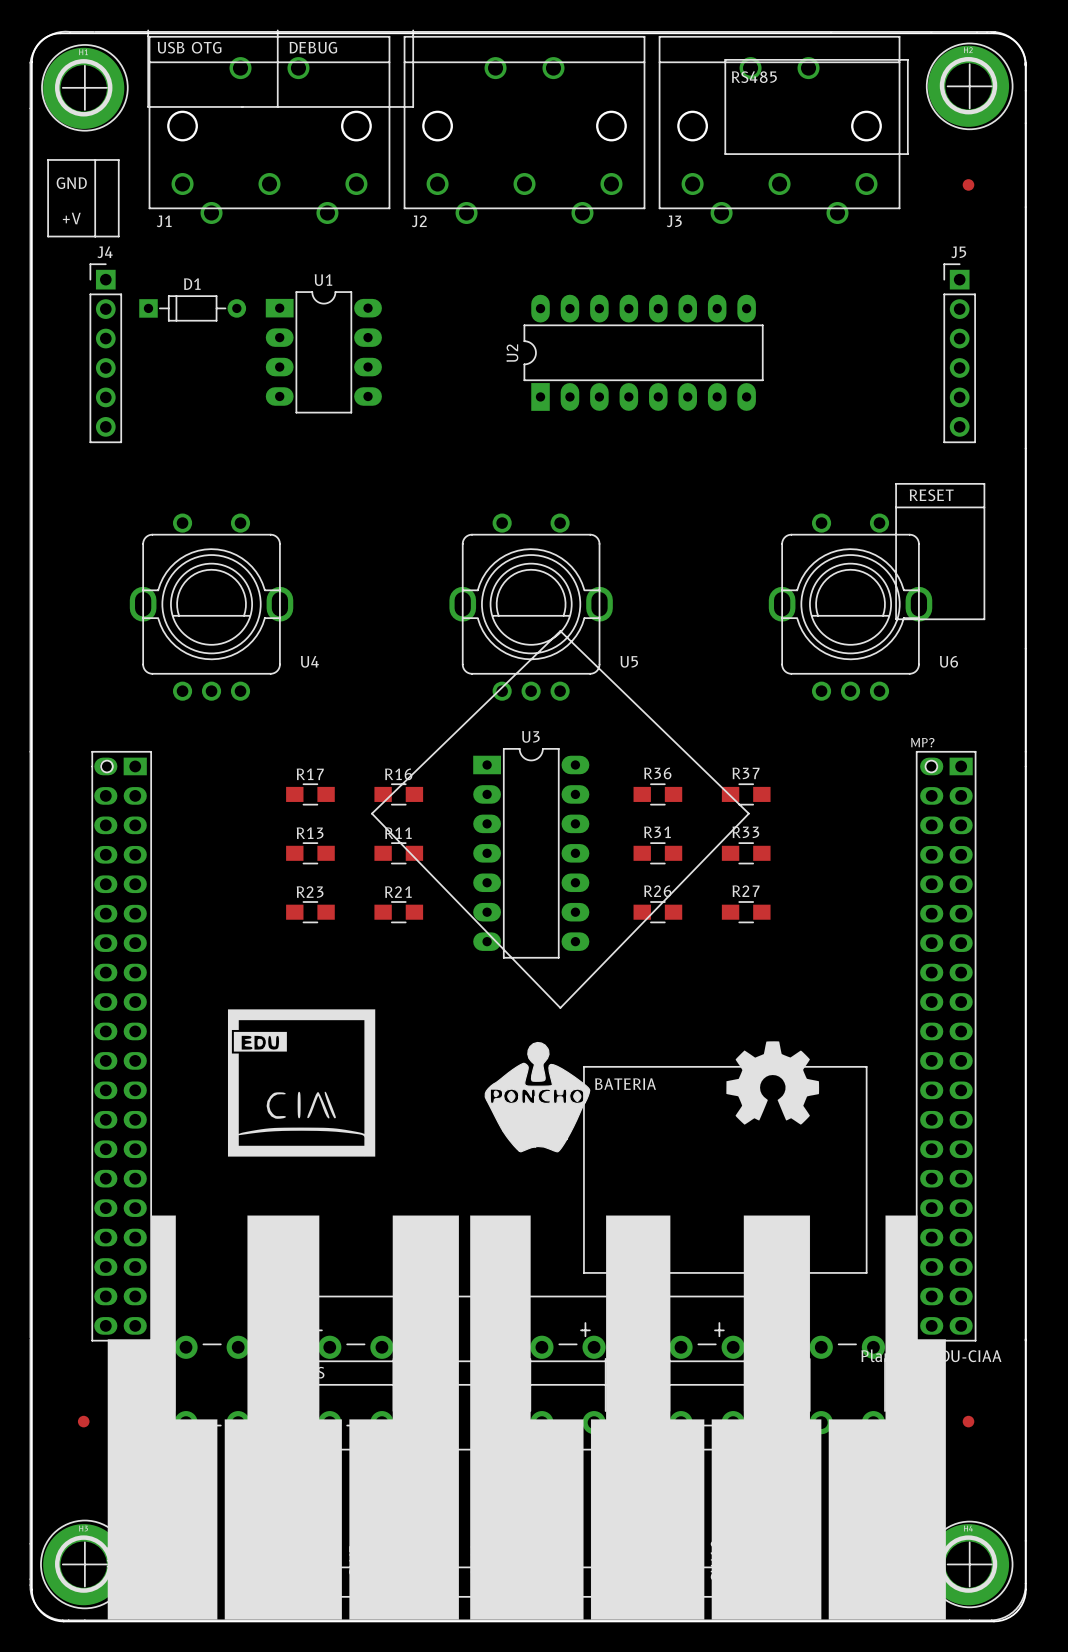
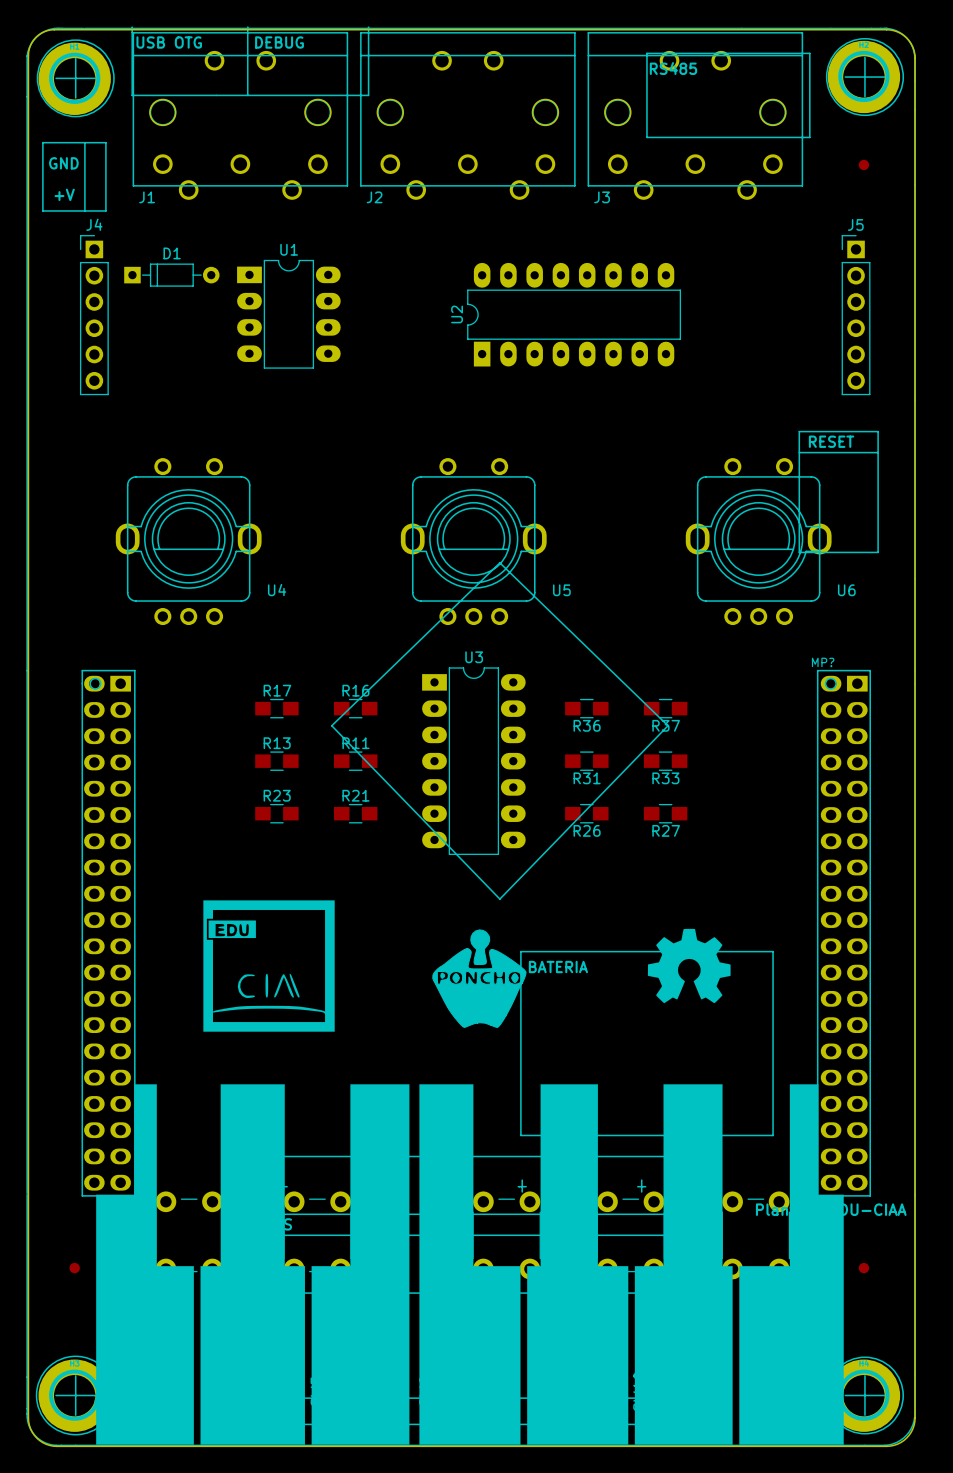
R36 name position: R36 (657, 773) -> R36 (587, 725)
R37 name position: R37 (746, 773) -> R37 (666, 725)
R31 name position: R31 (657, 832) -> R31 (587, 778)
R33 name position: R33 (745, 832) -> R33 (665, 778)
R26 name position: R26 (657, 891) -> R26 (587, 830)
R27 name position: R27 (746, 891) -> R27 (666, 830)

